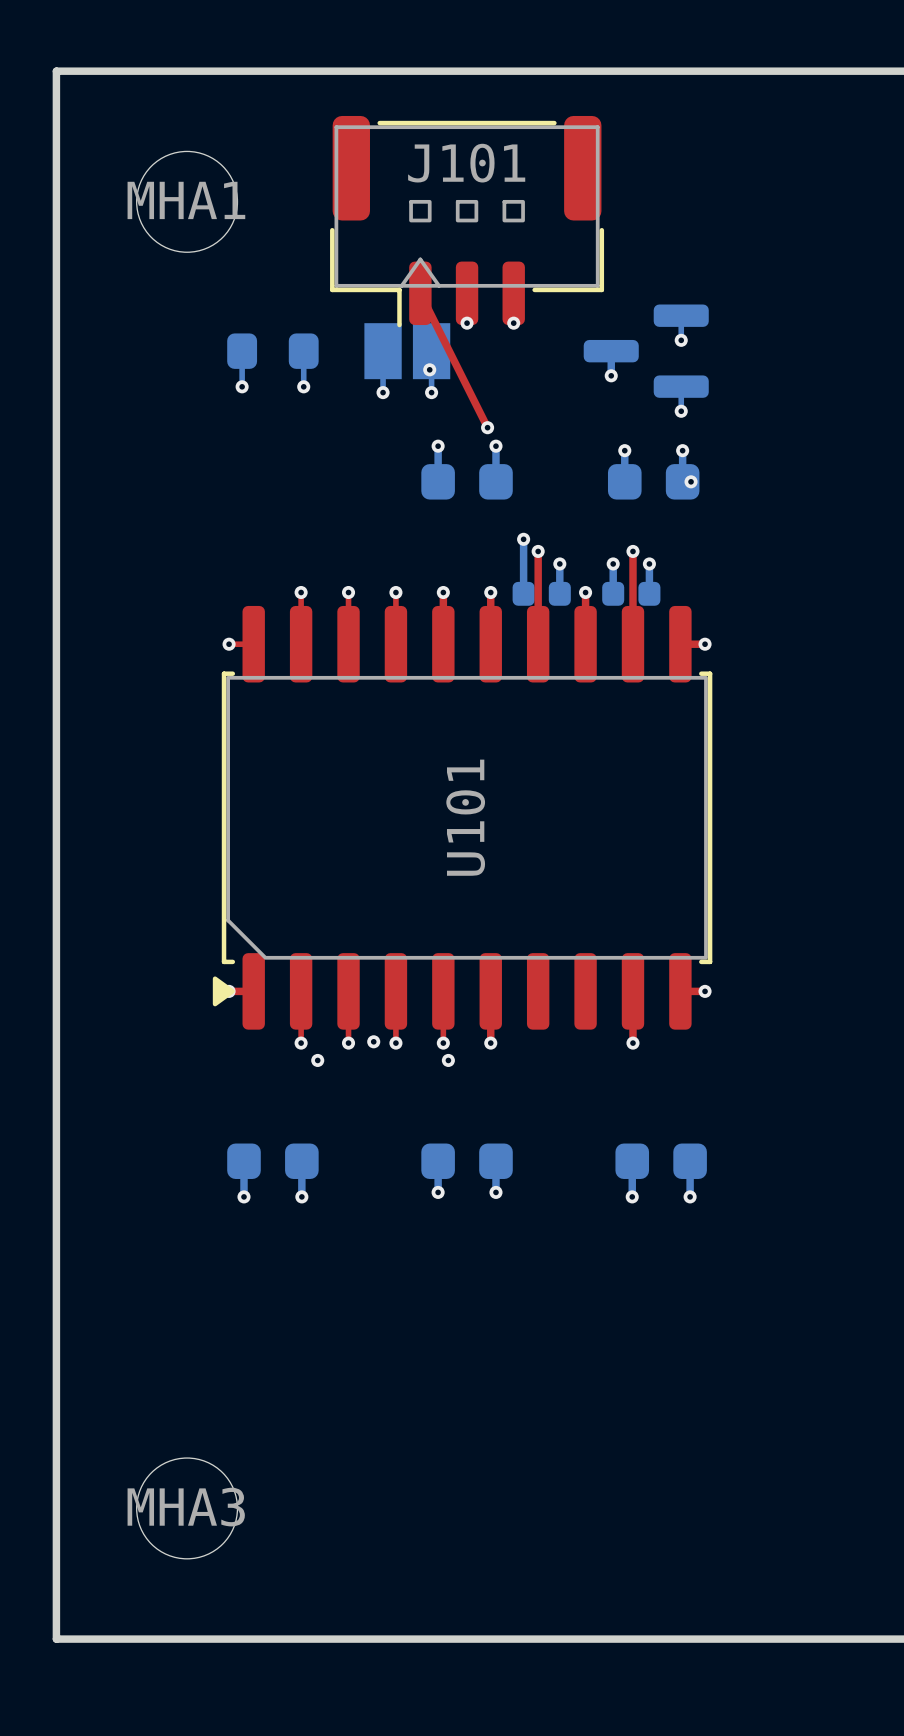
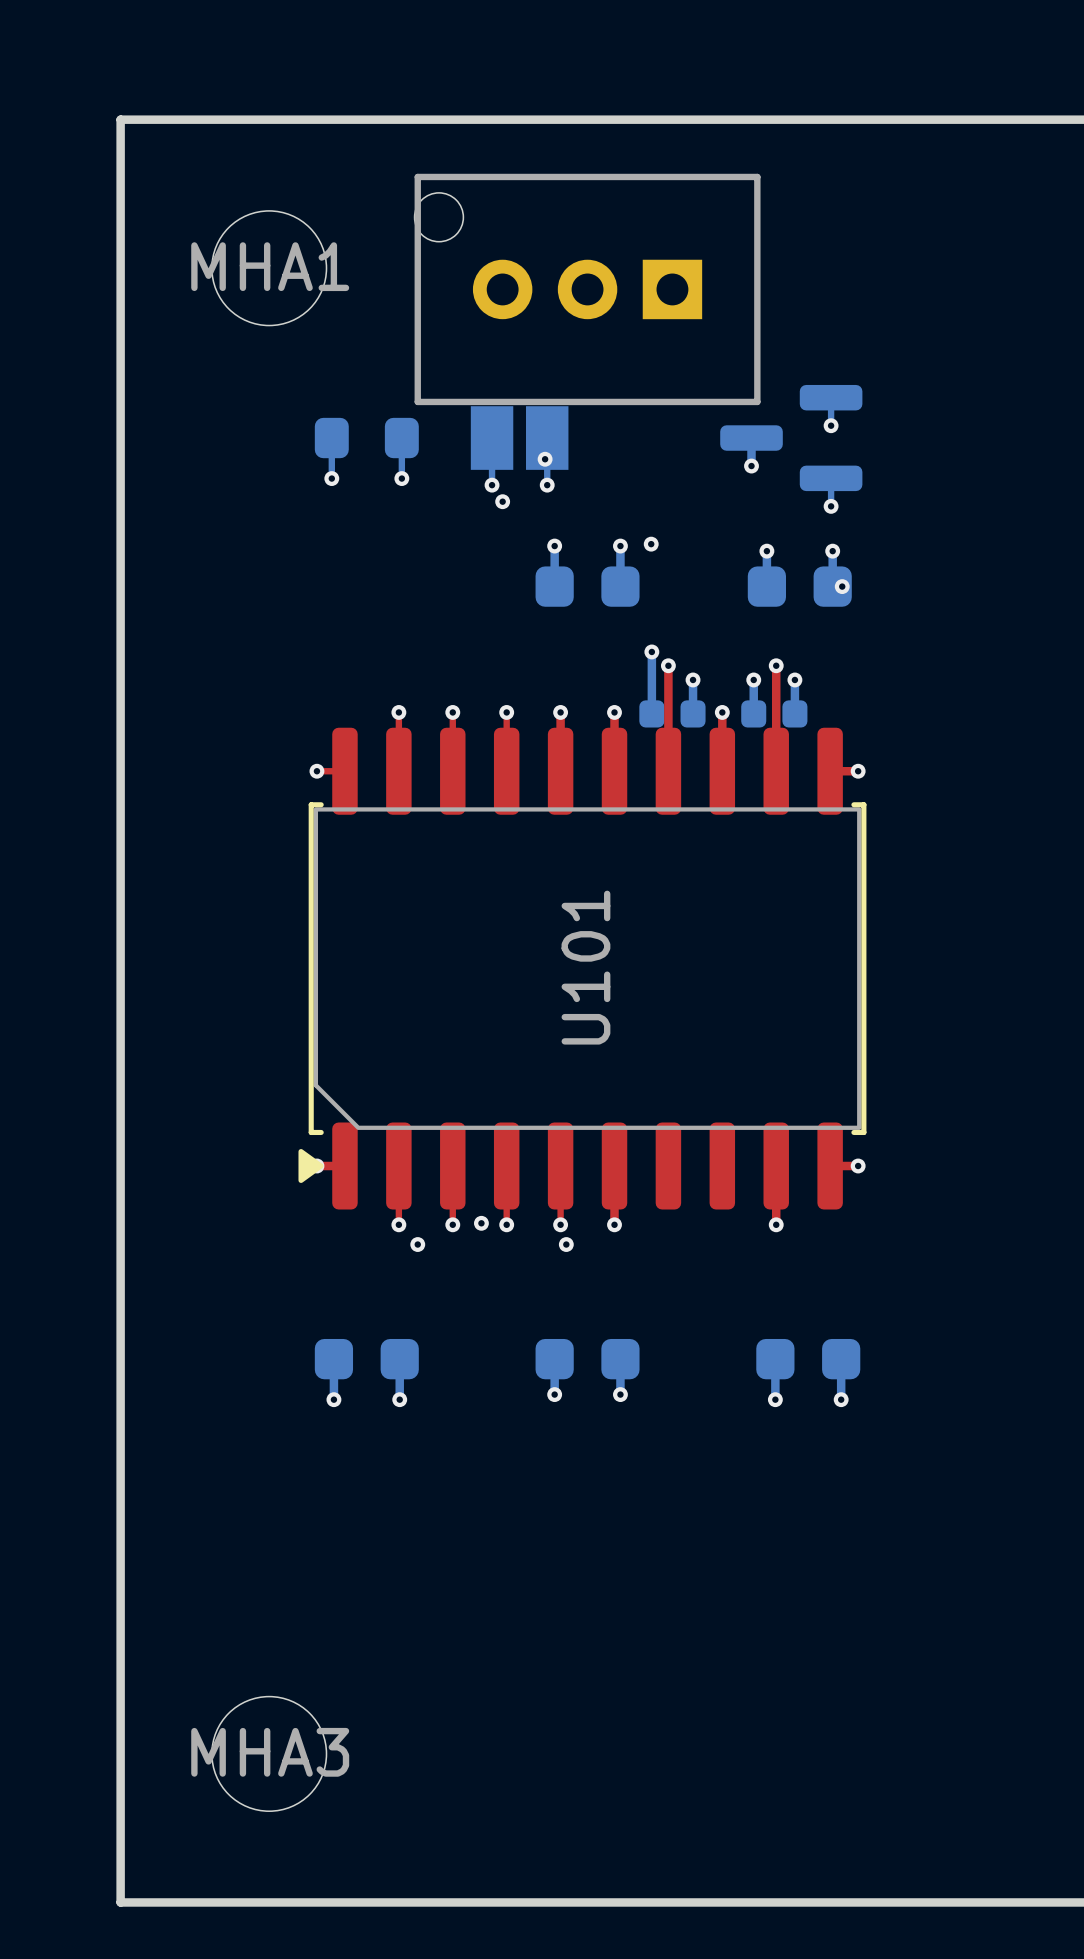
part: none -> (587, 289)
J101: (467, 221) -> none
top track: (420, 293) (487, 427) -> none
via: (467, 323) -> none
via: (513, 323) -> none
via: none -> (502, 501)
via position: (487, 427) -> (651, 544)

